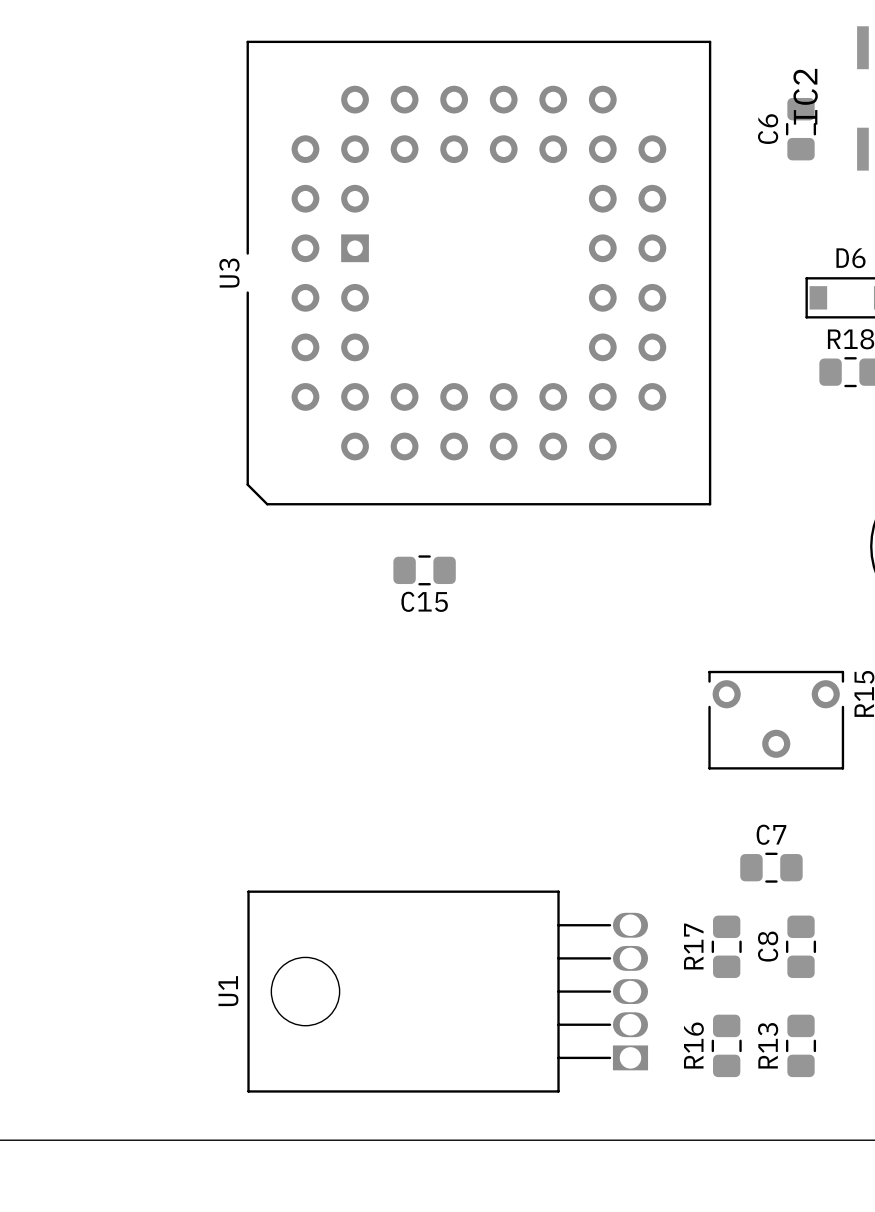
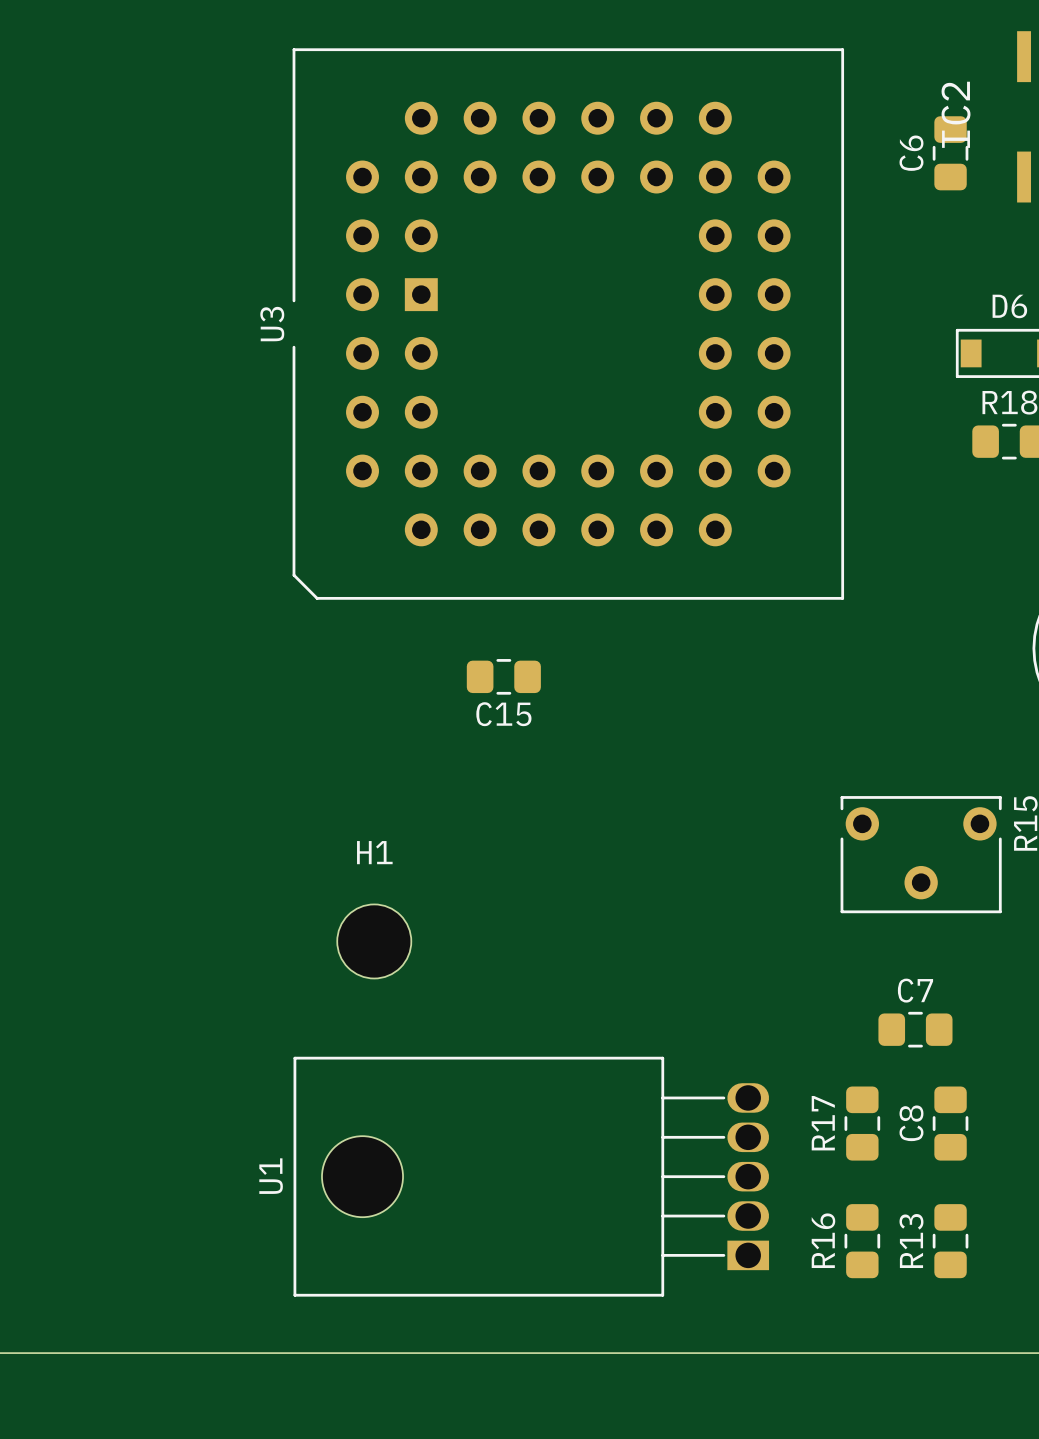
H1: none -> (374, 941)

